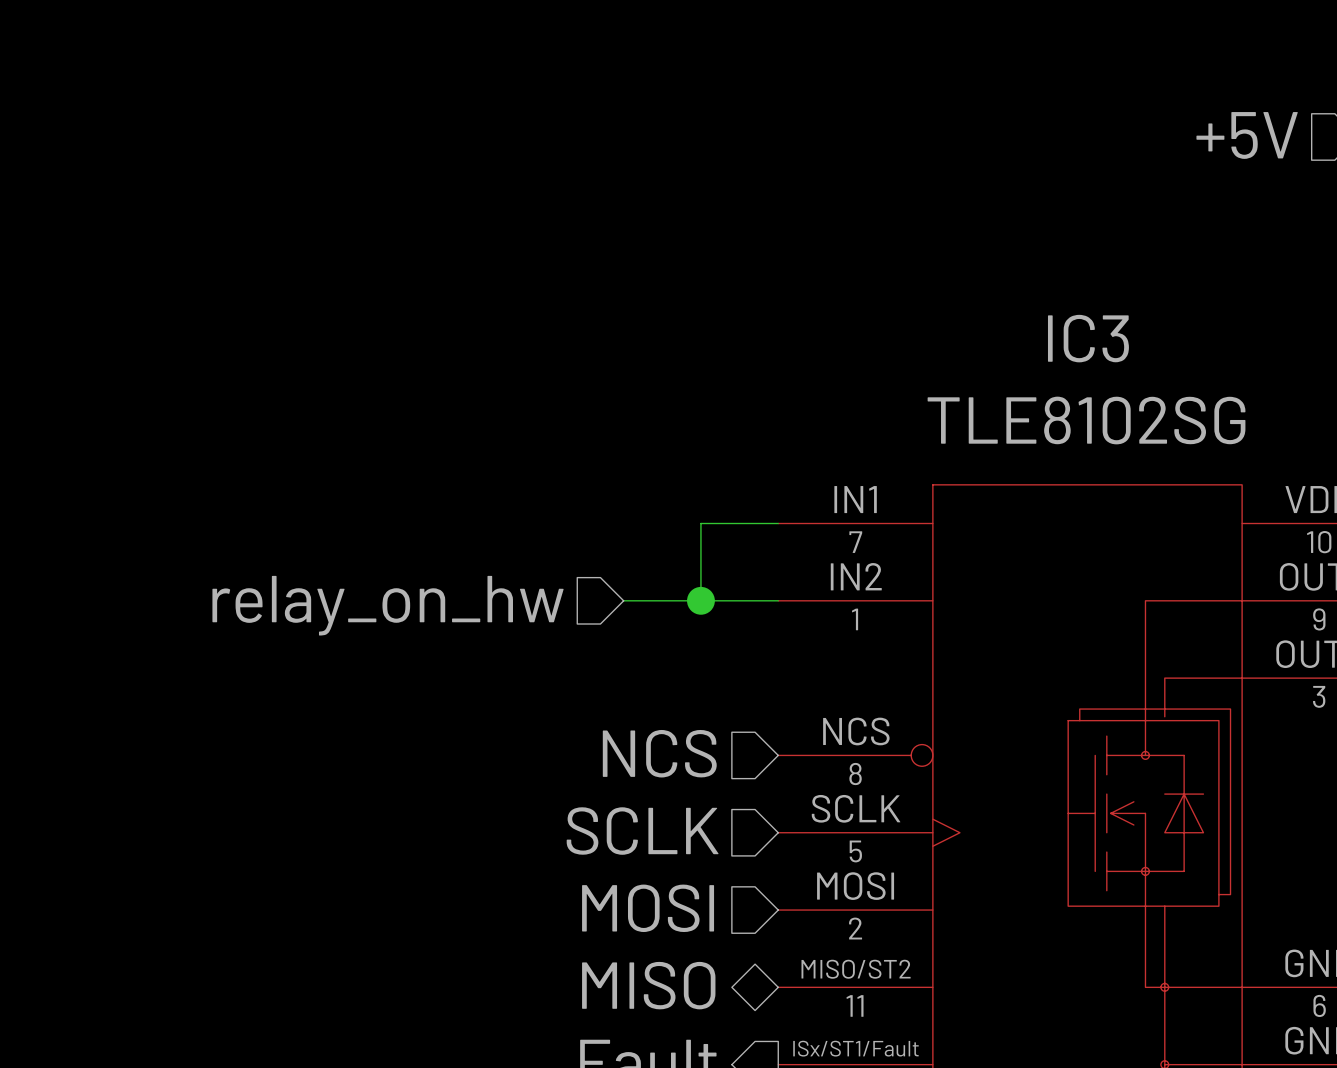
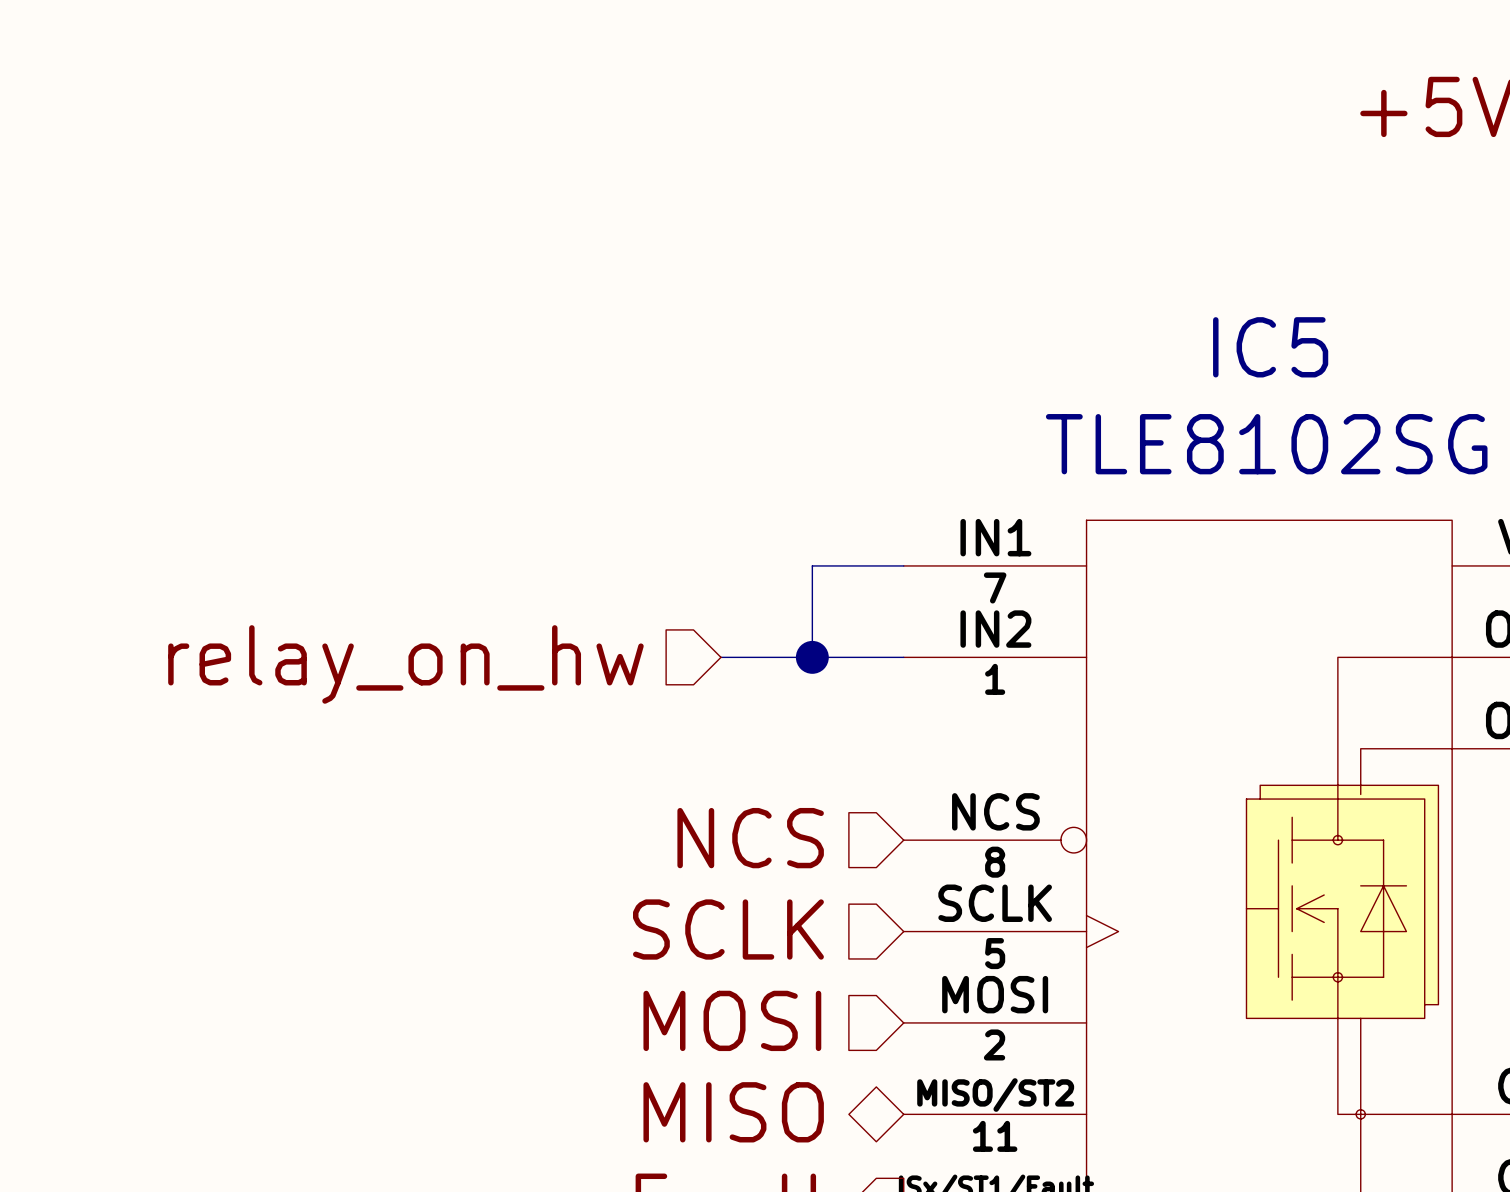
IC3 name: IC3 (1088, 338) -> IC5 (1270, 347)

